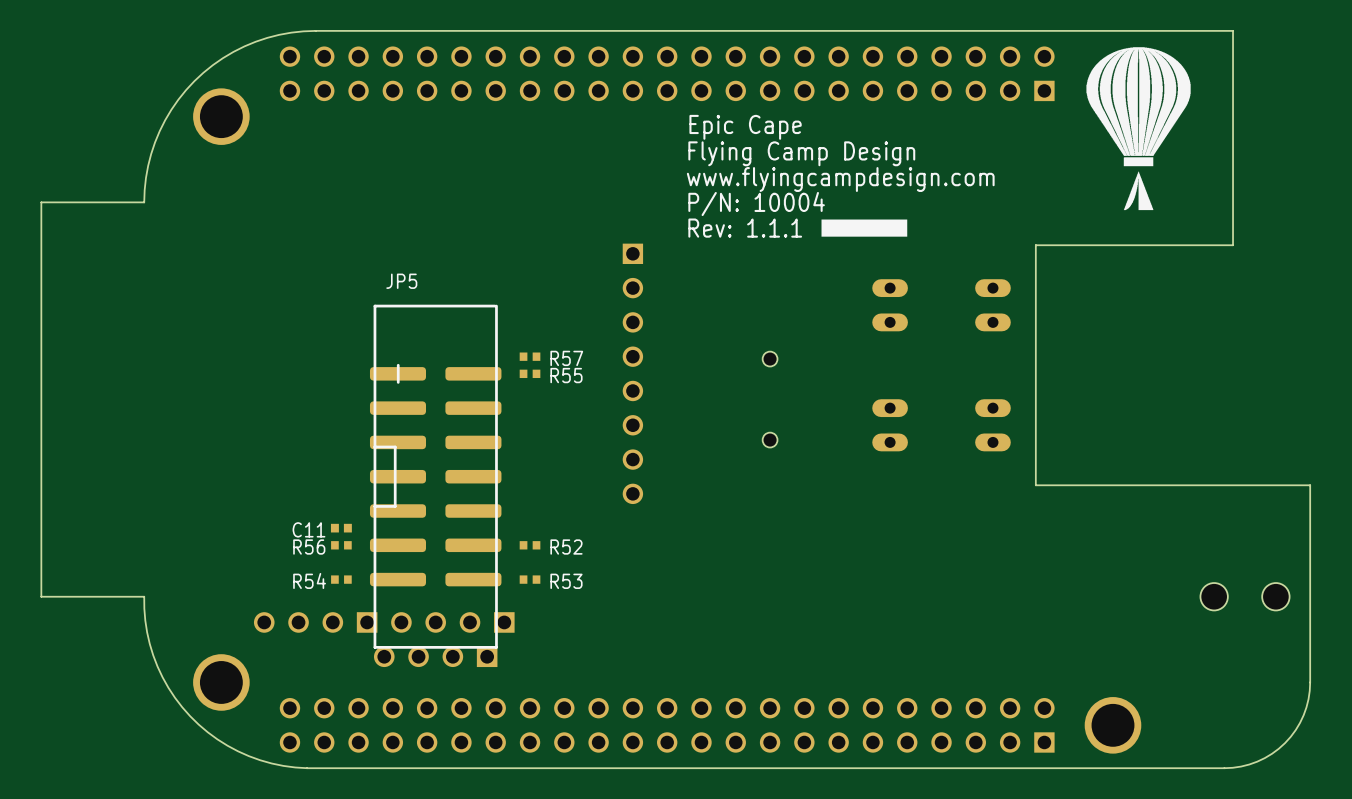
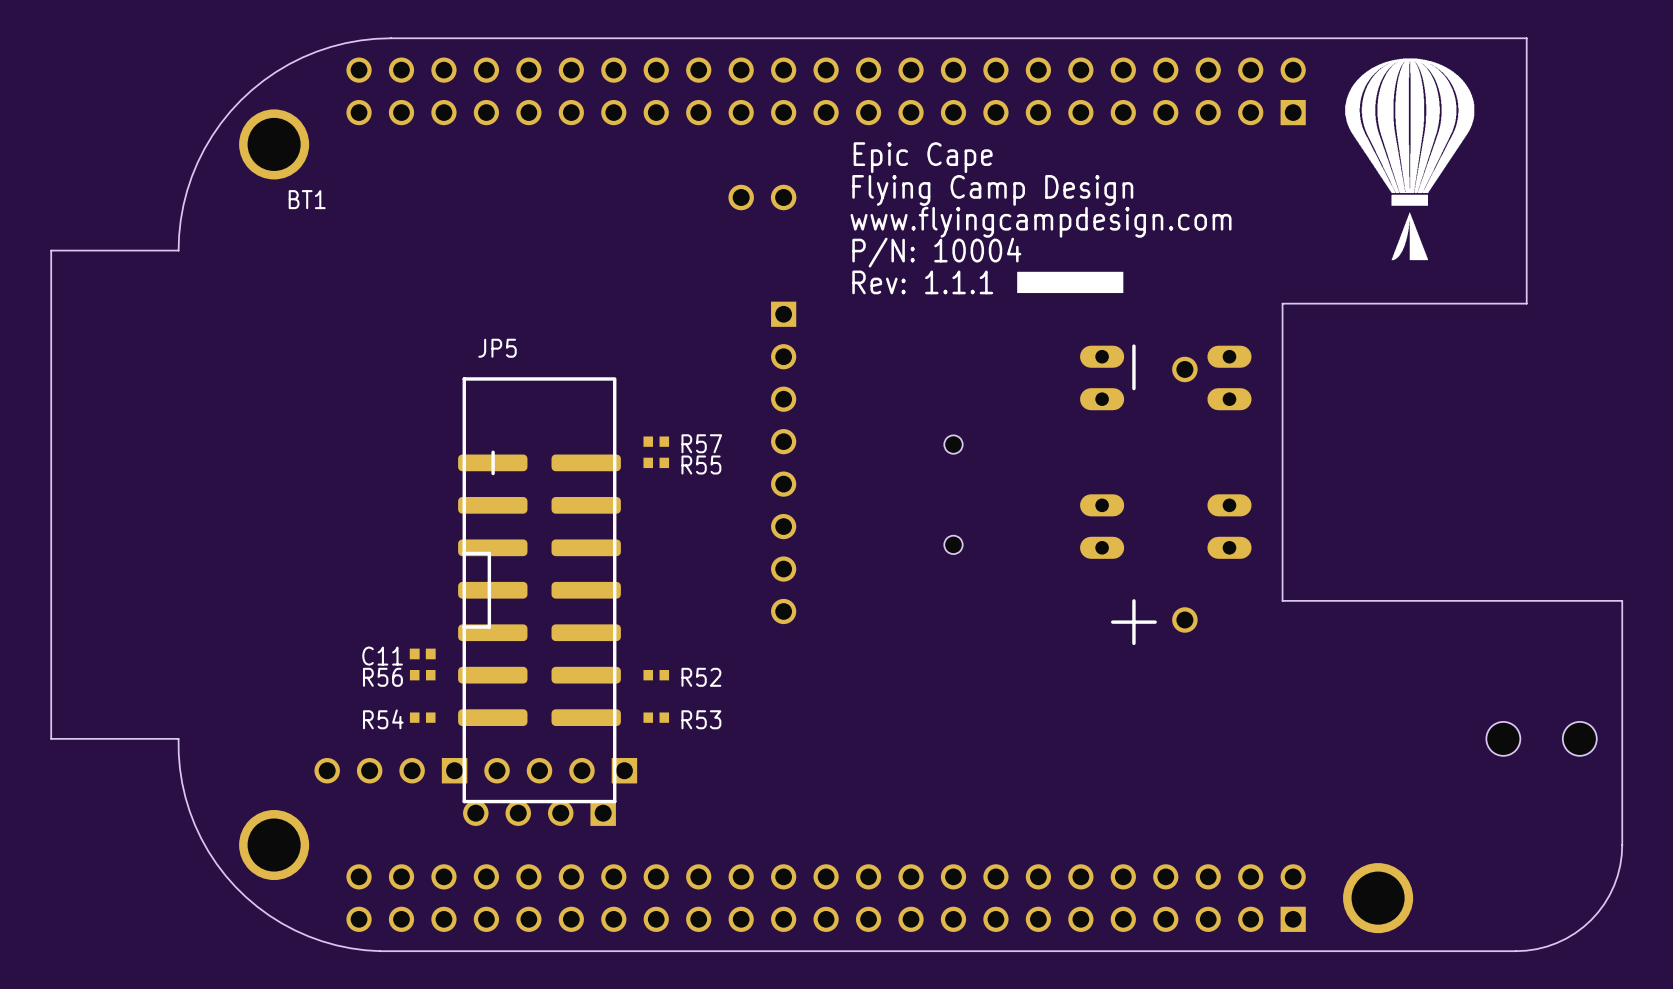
part: none -> (762, 197)
BT1: none -> (1154, 494)

